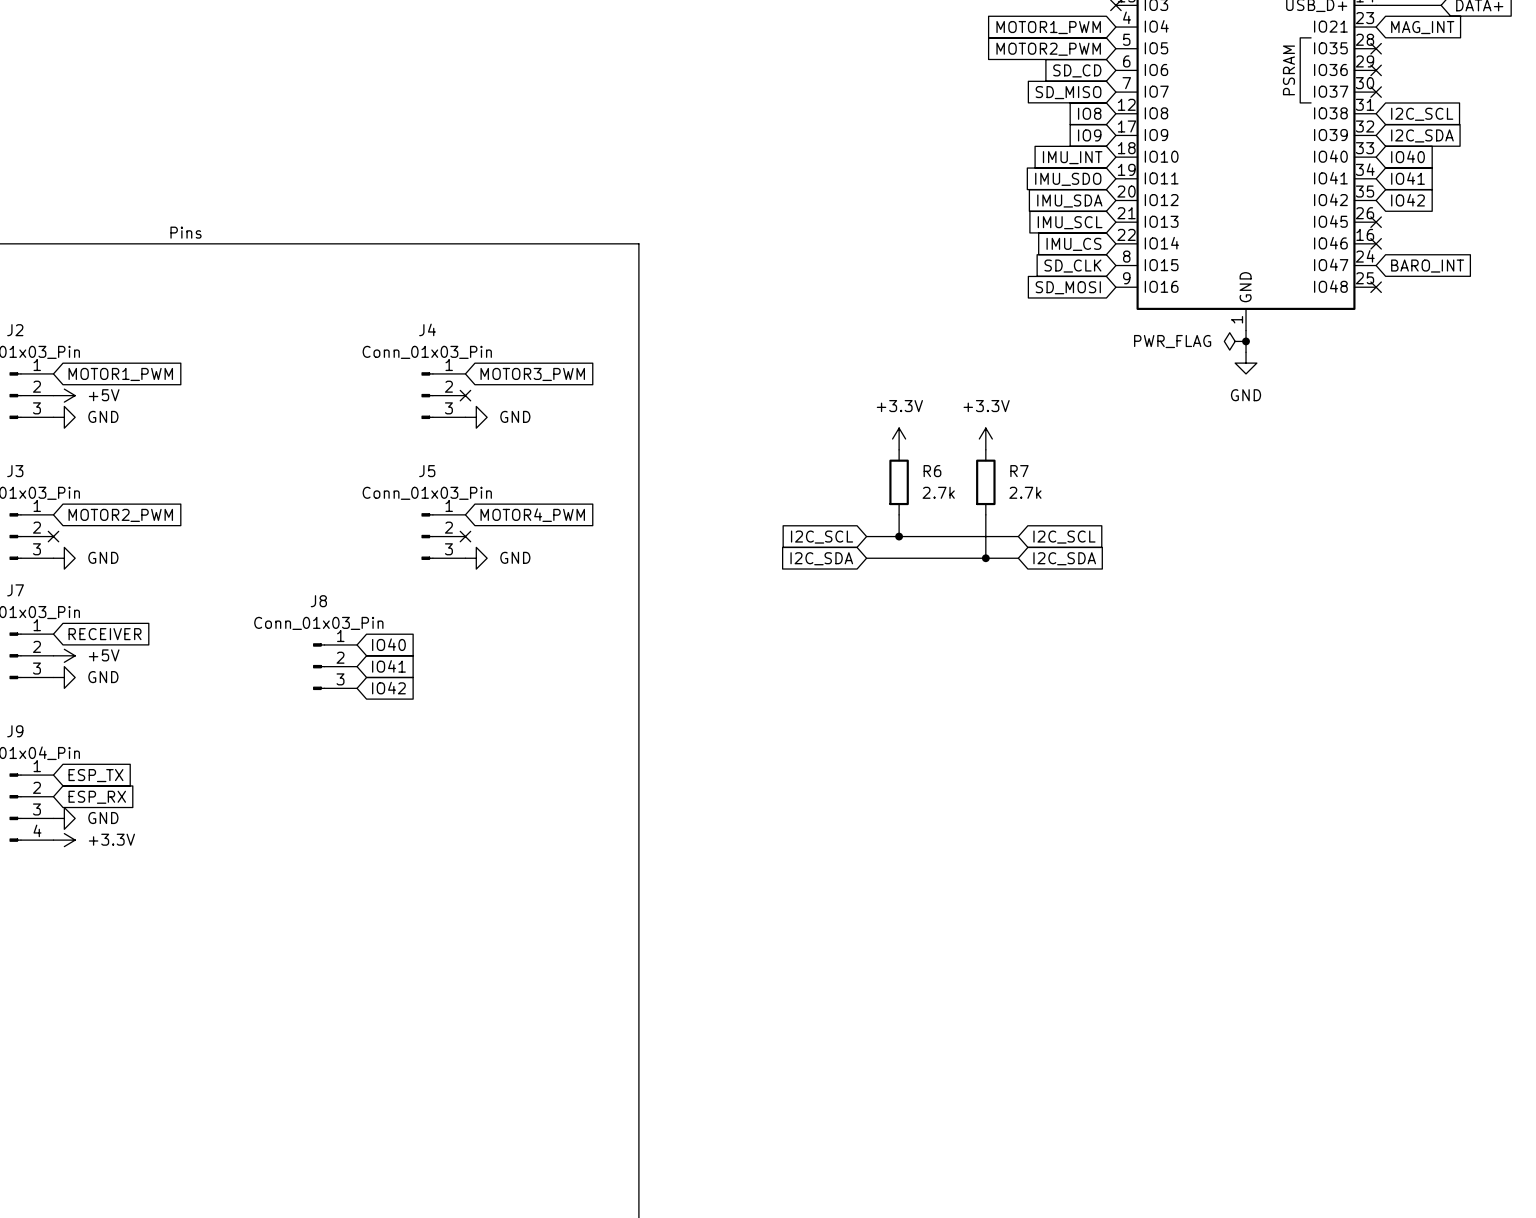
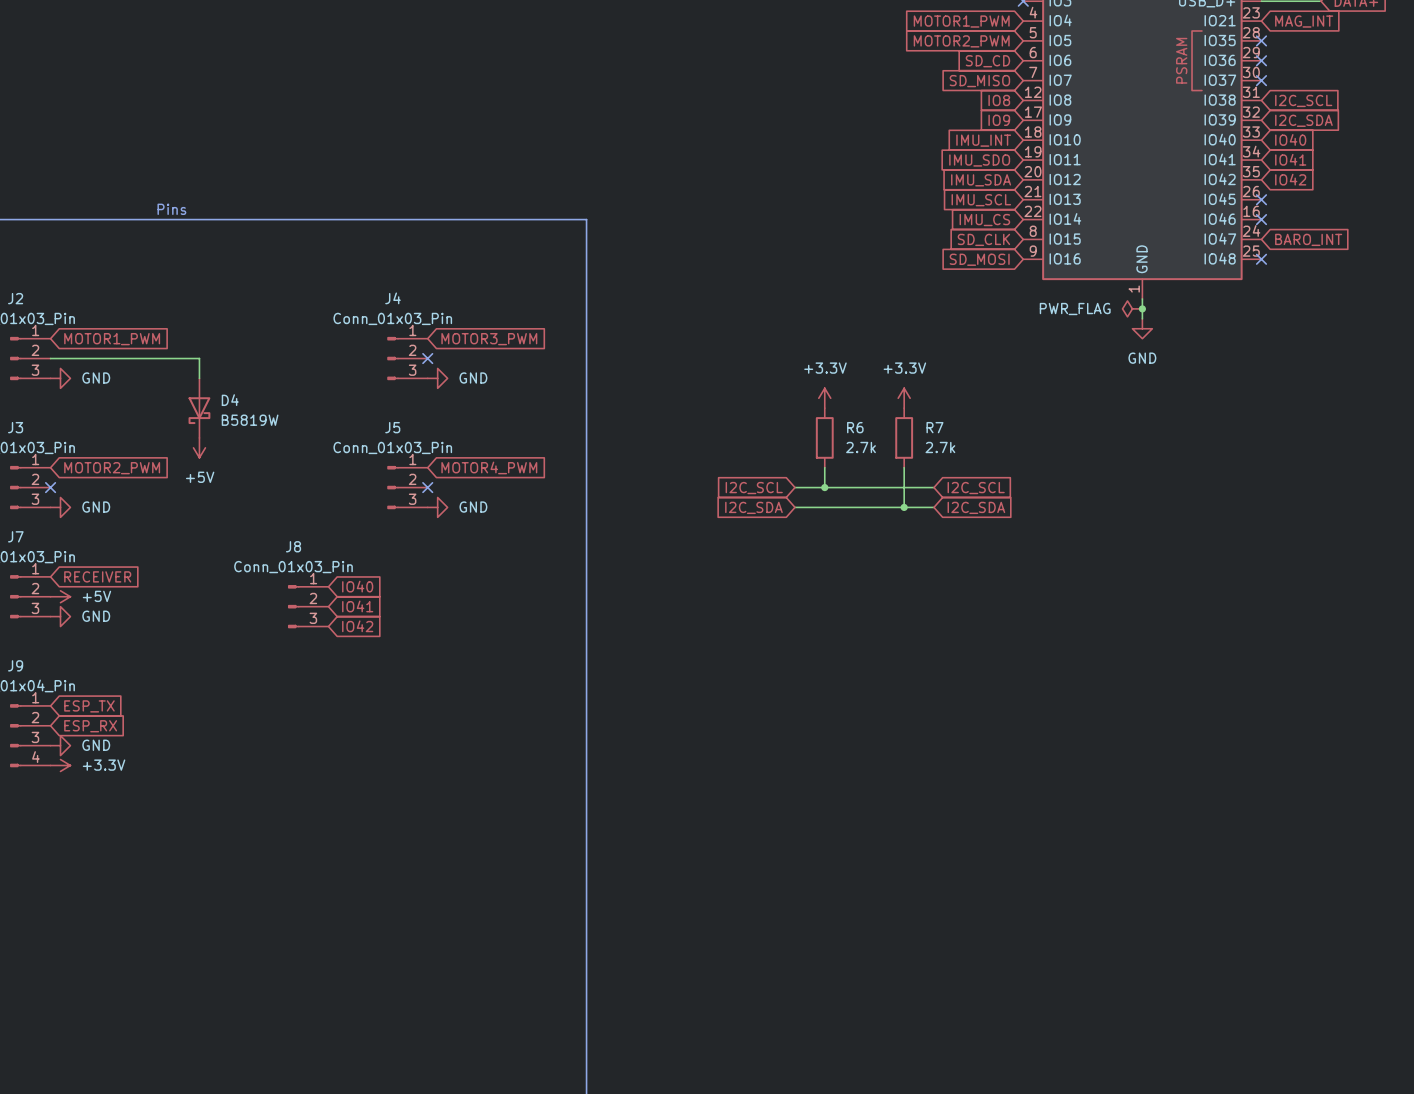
wire: none -> (50, 358) (199, 358) (199, 378)
power symbol rotation: 0° (64, 395) -> 90° clockwise (199, 447)
power symbol position: +5V (64, 395) -> +5V (199, 447)
D4: none -> B5819W (199, 408)

